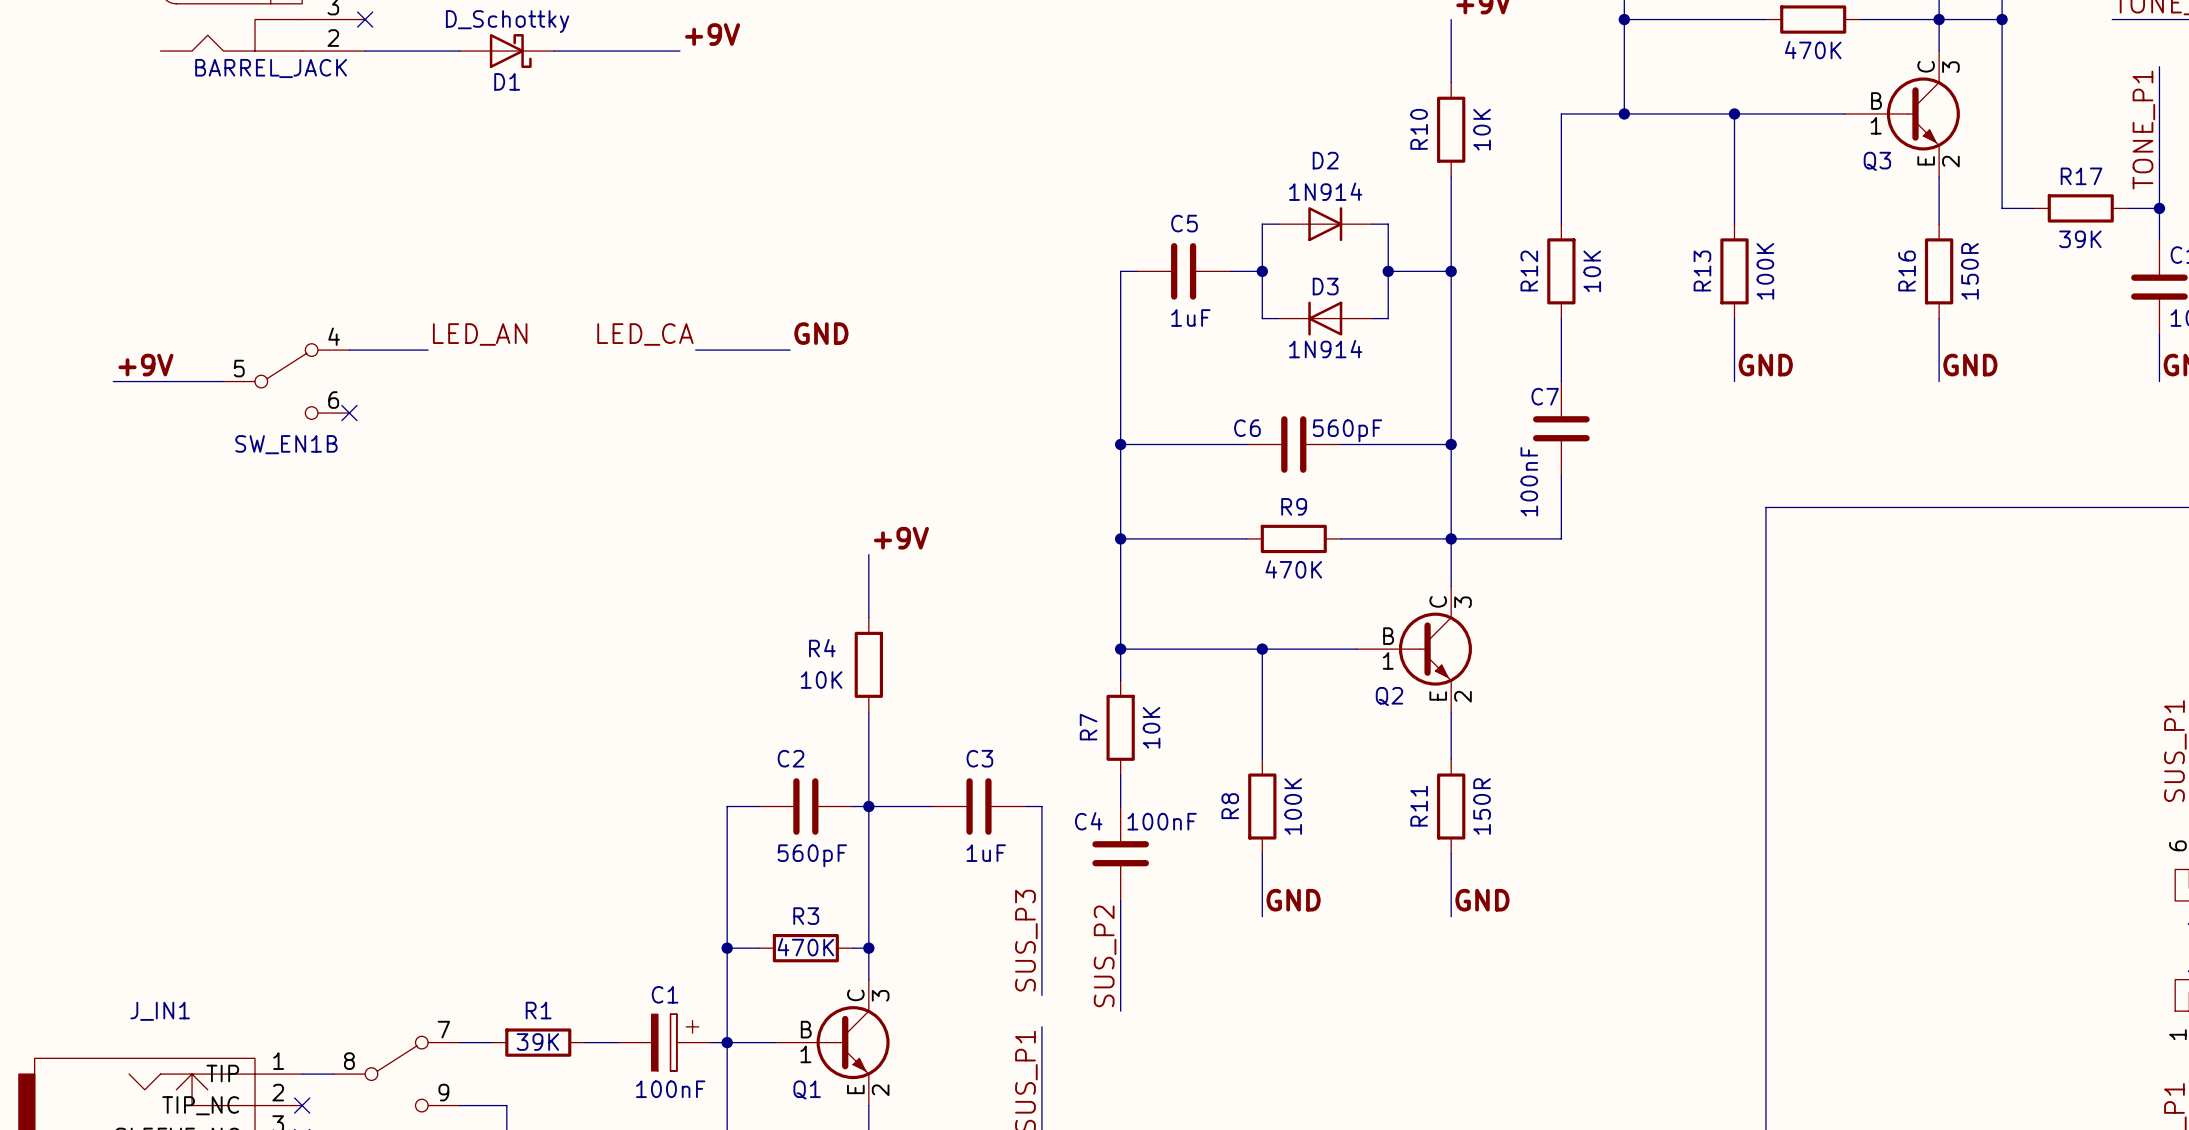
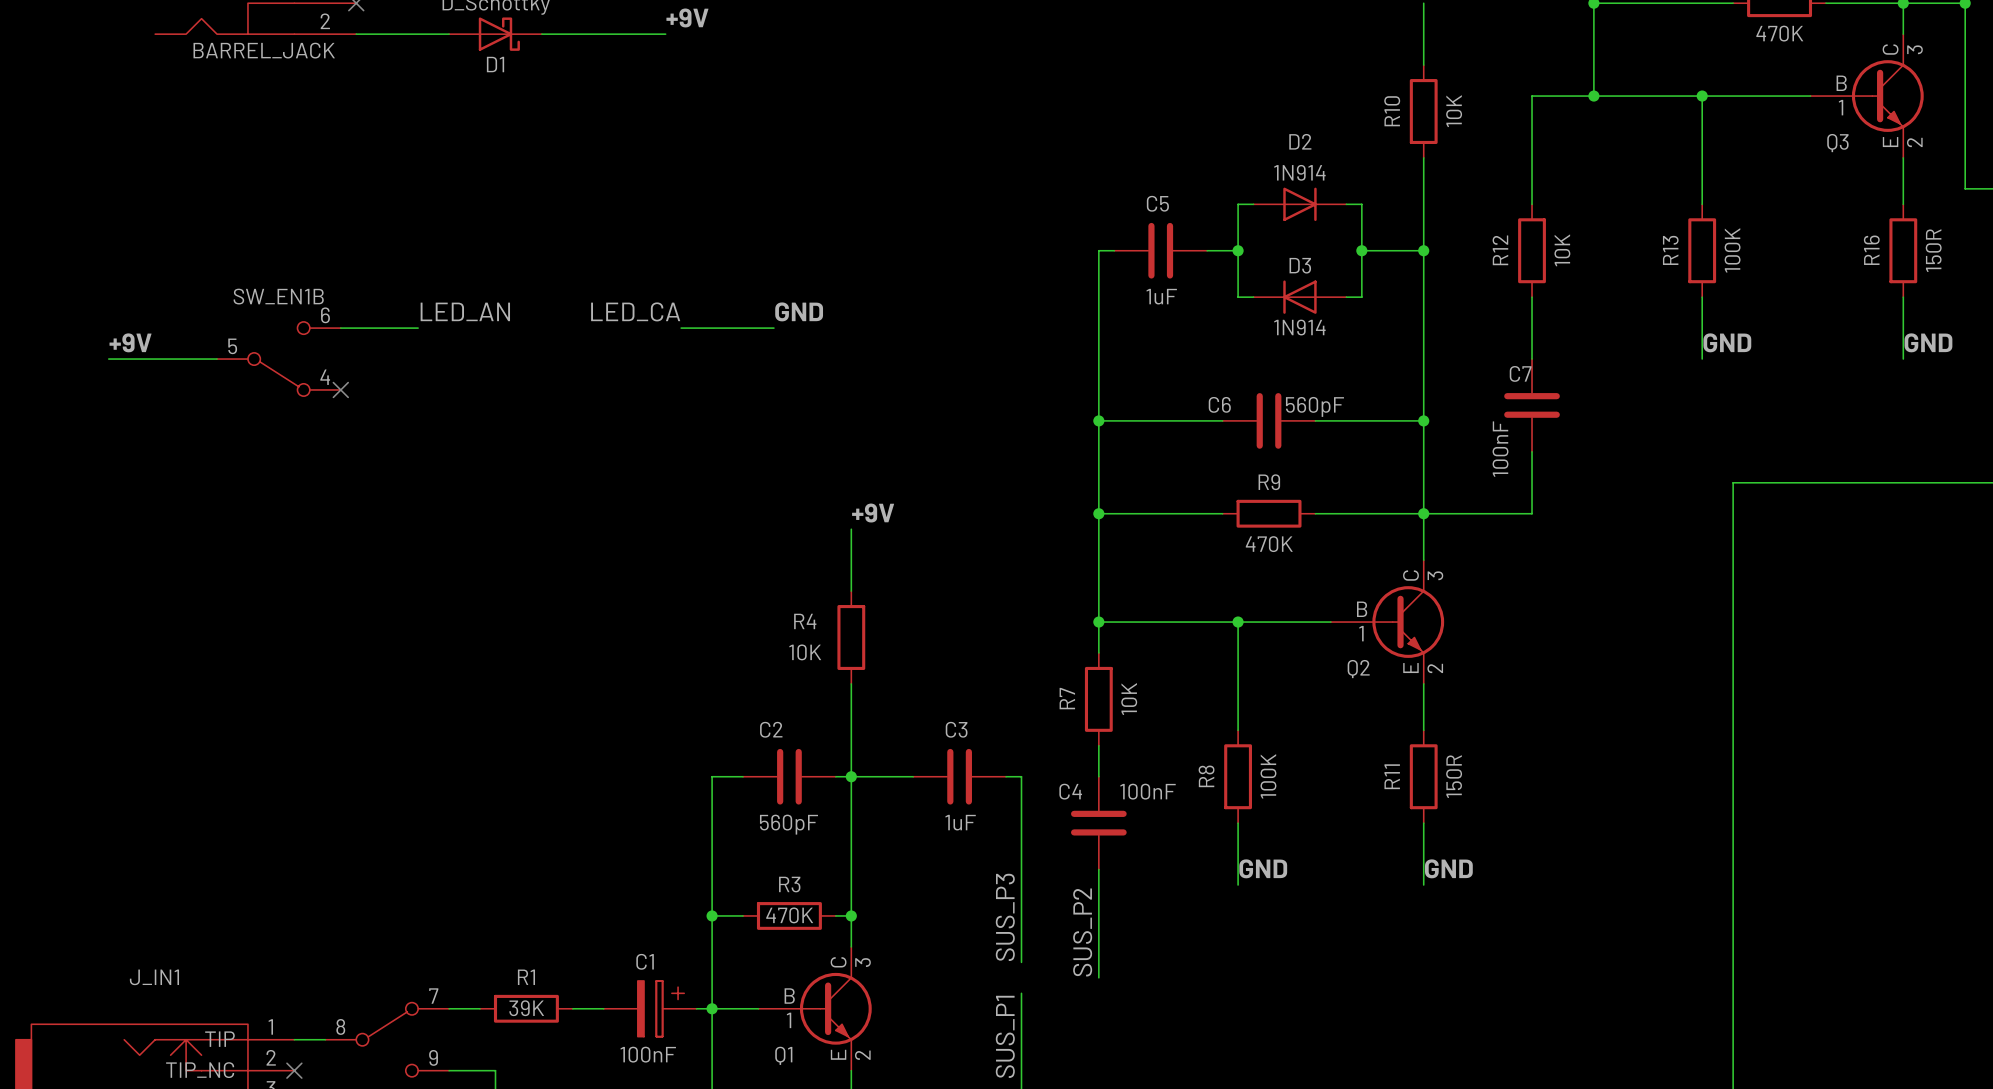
SW_EN1B flip: as is (286, 381) -> up-down (278, 359)

